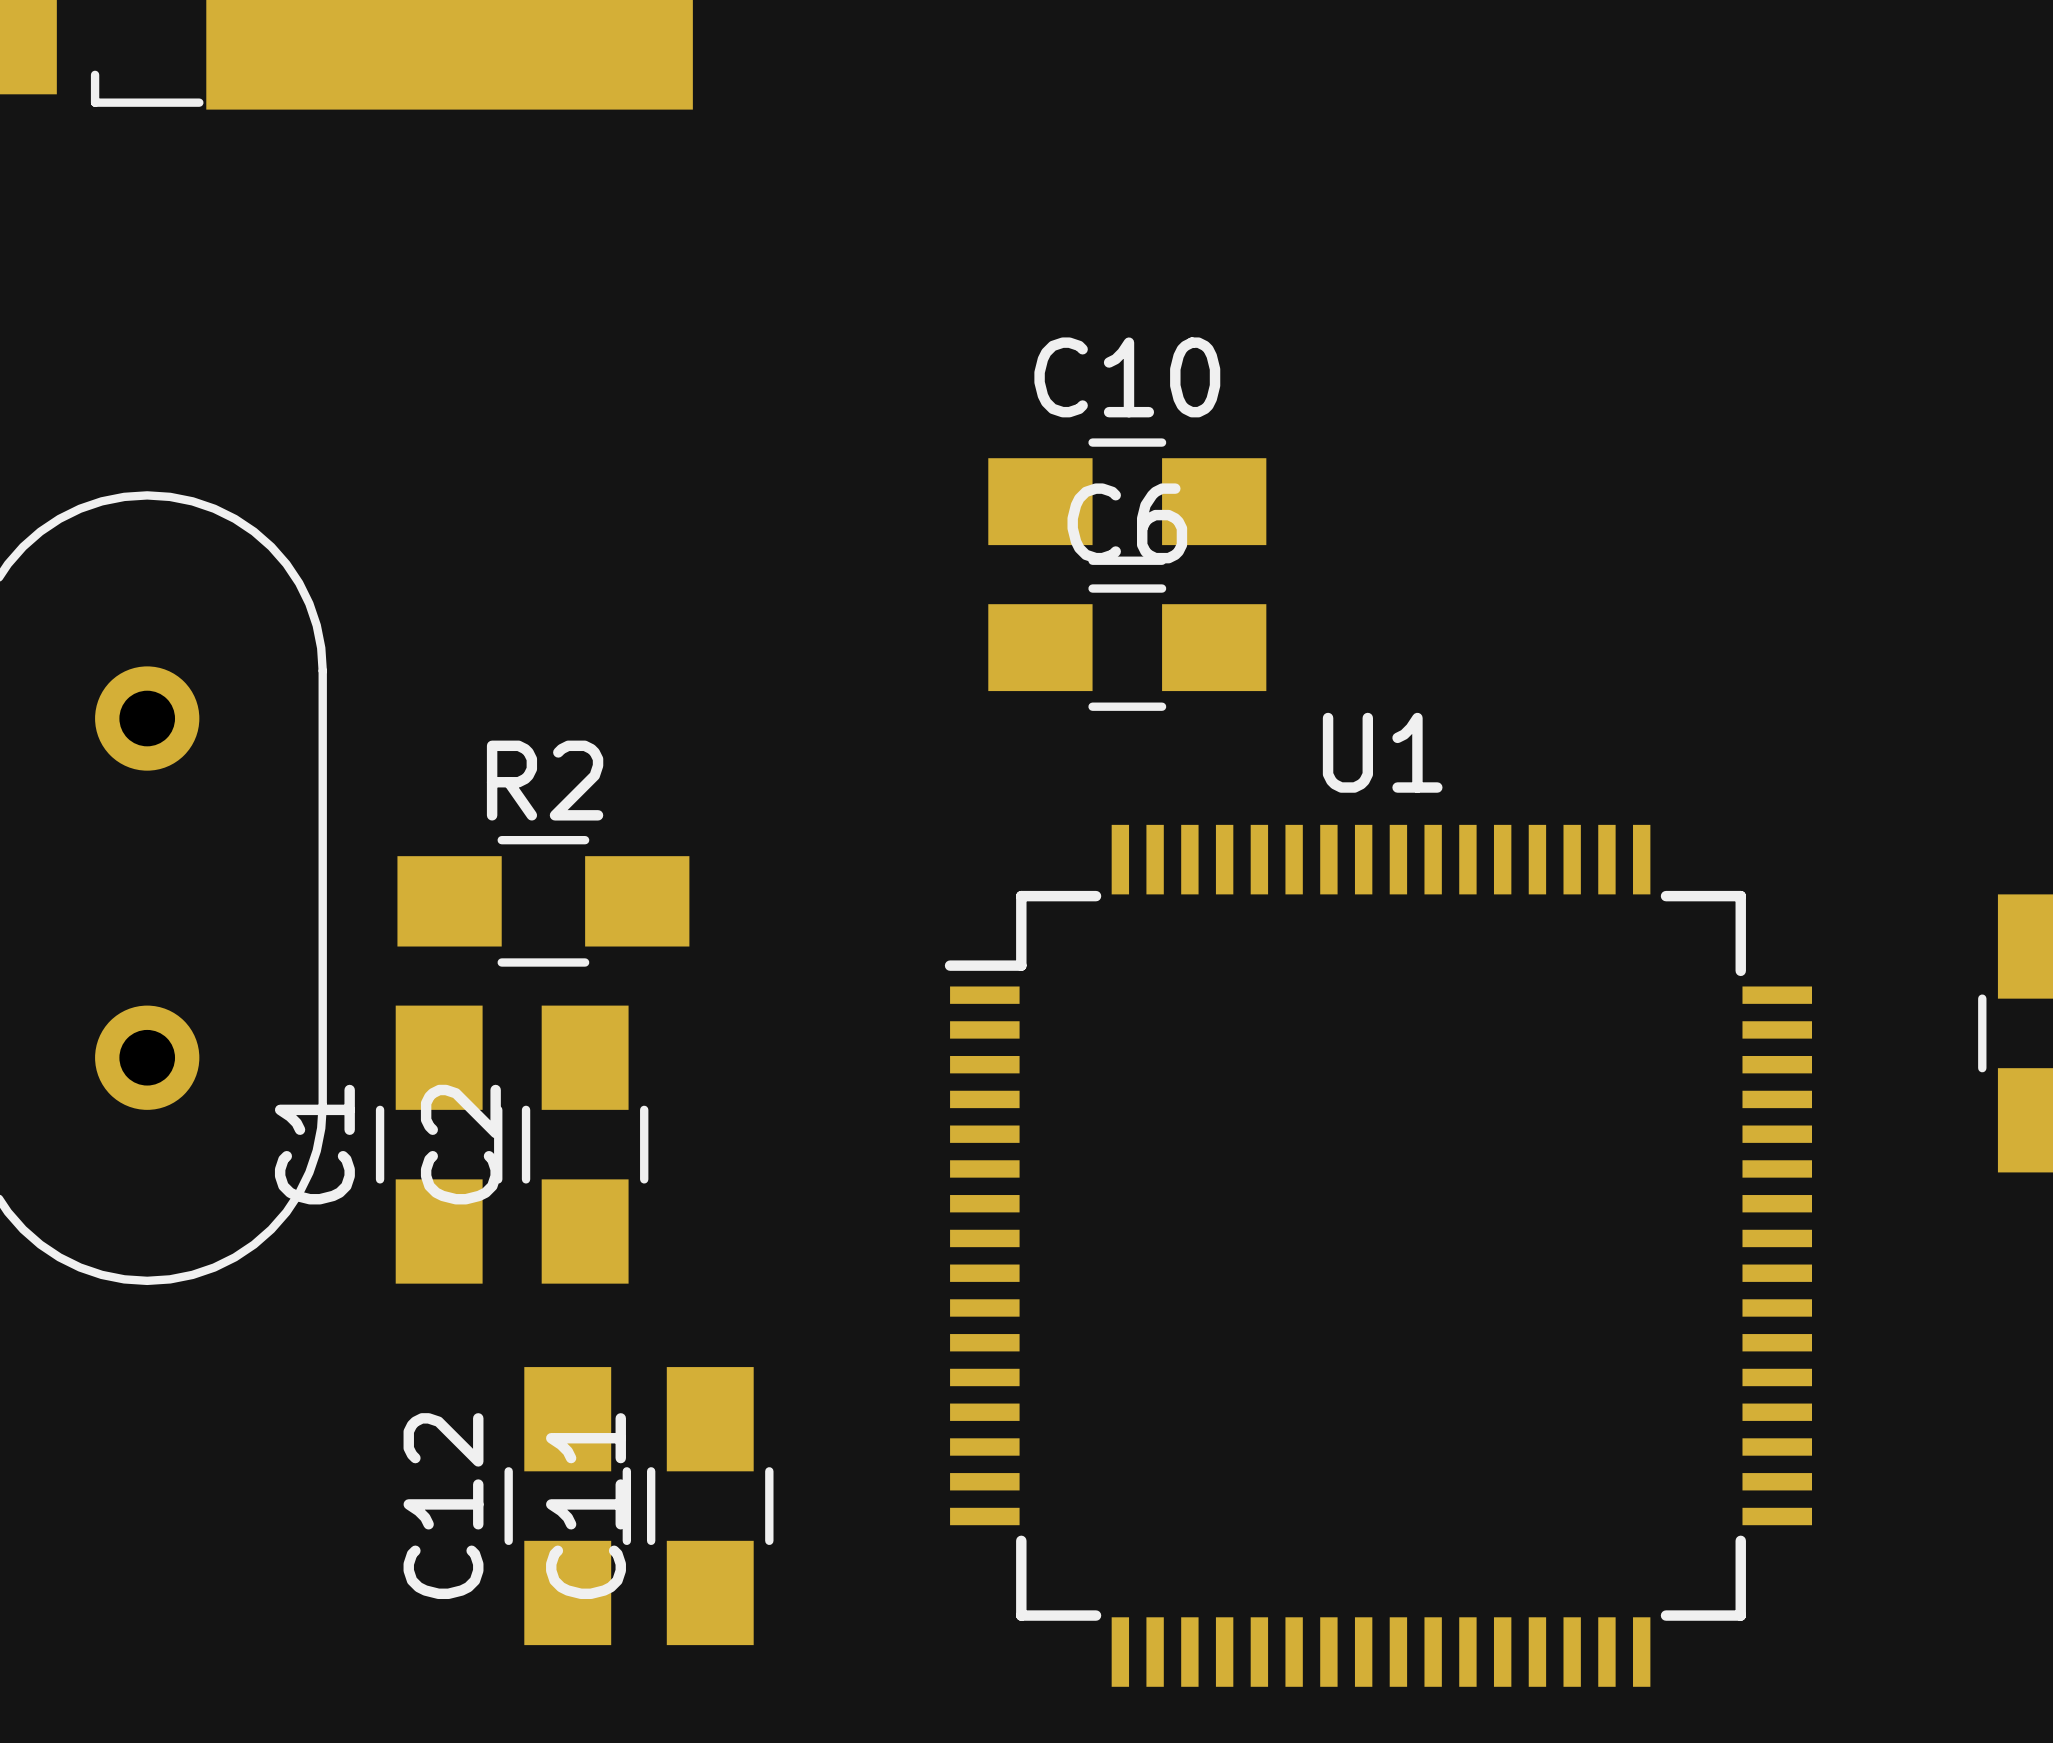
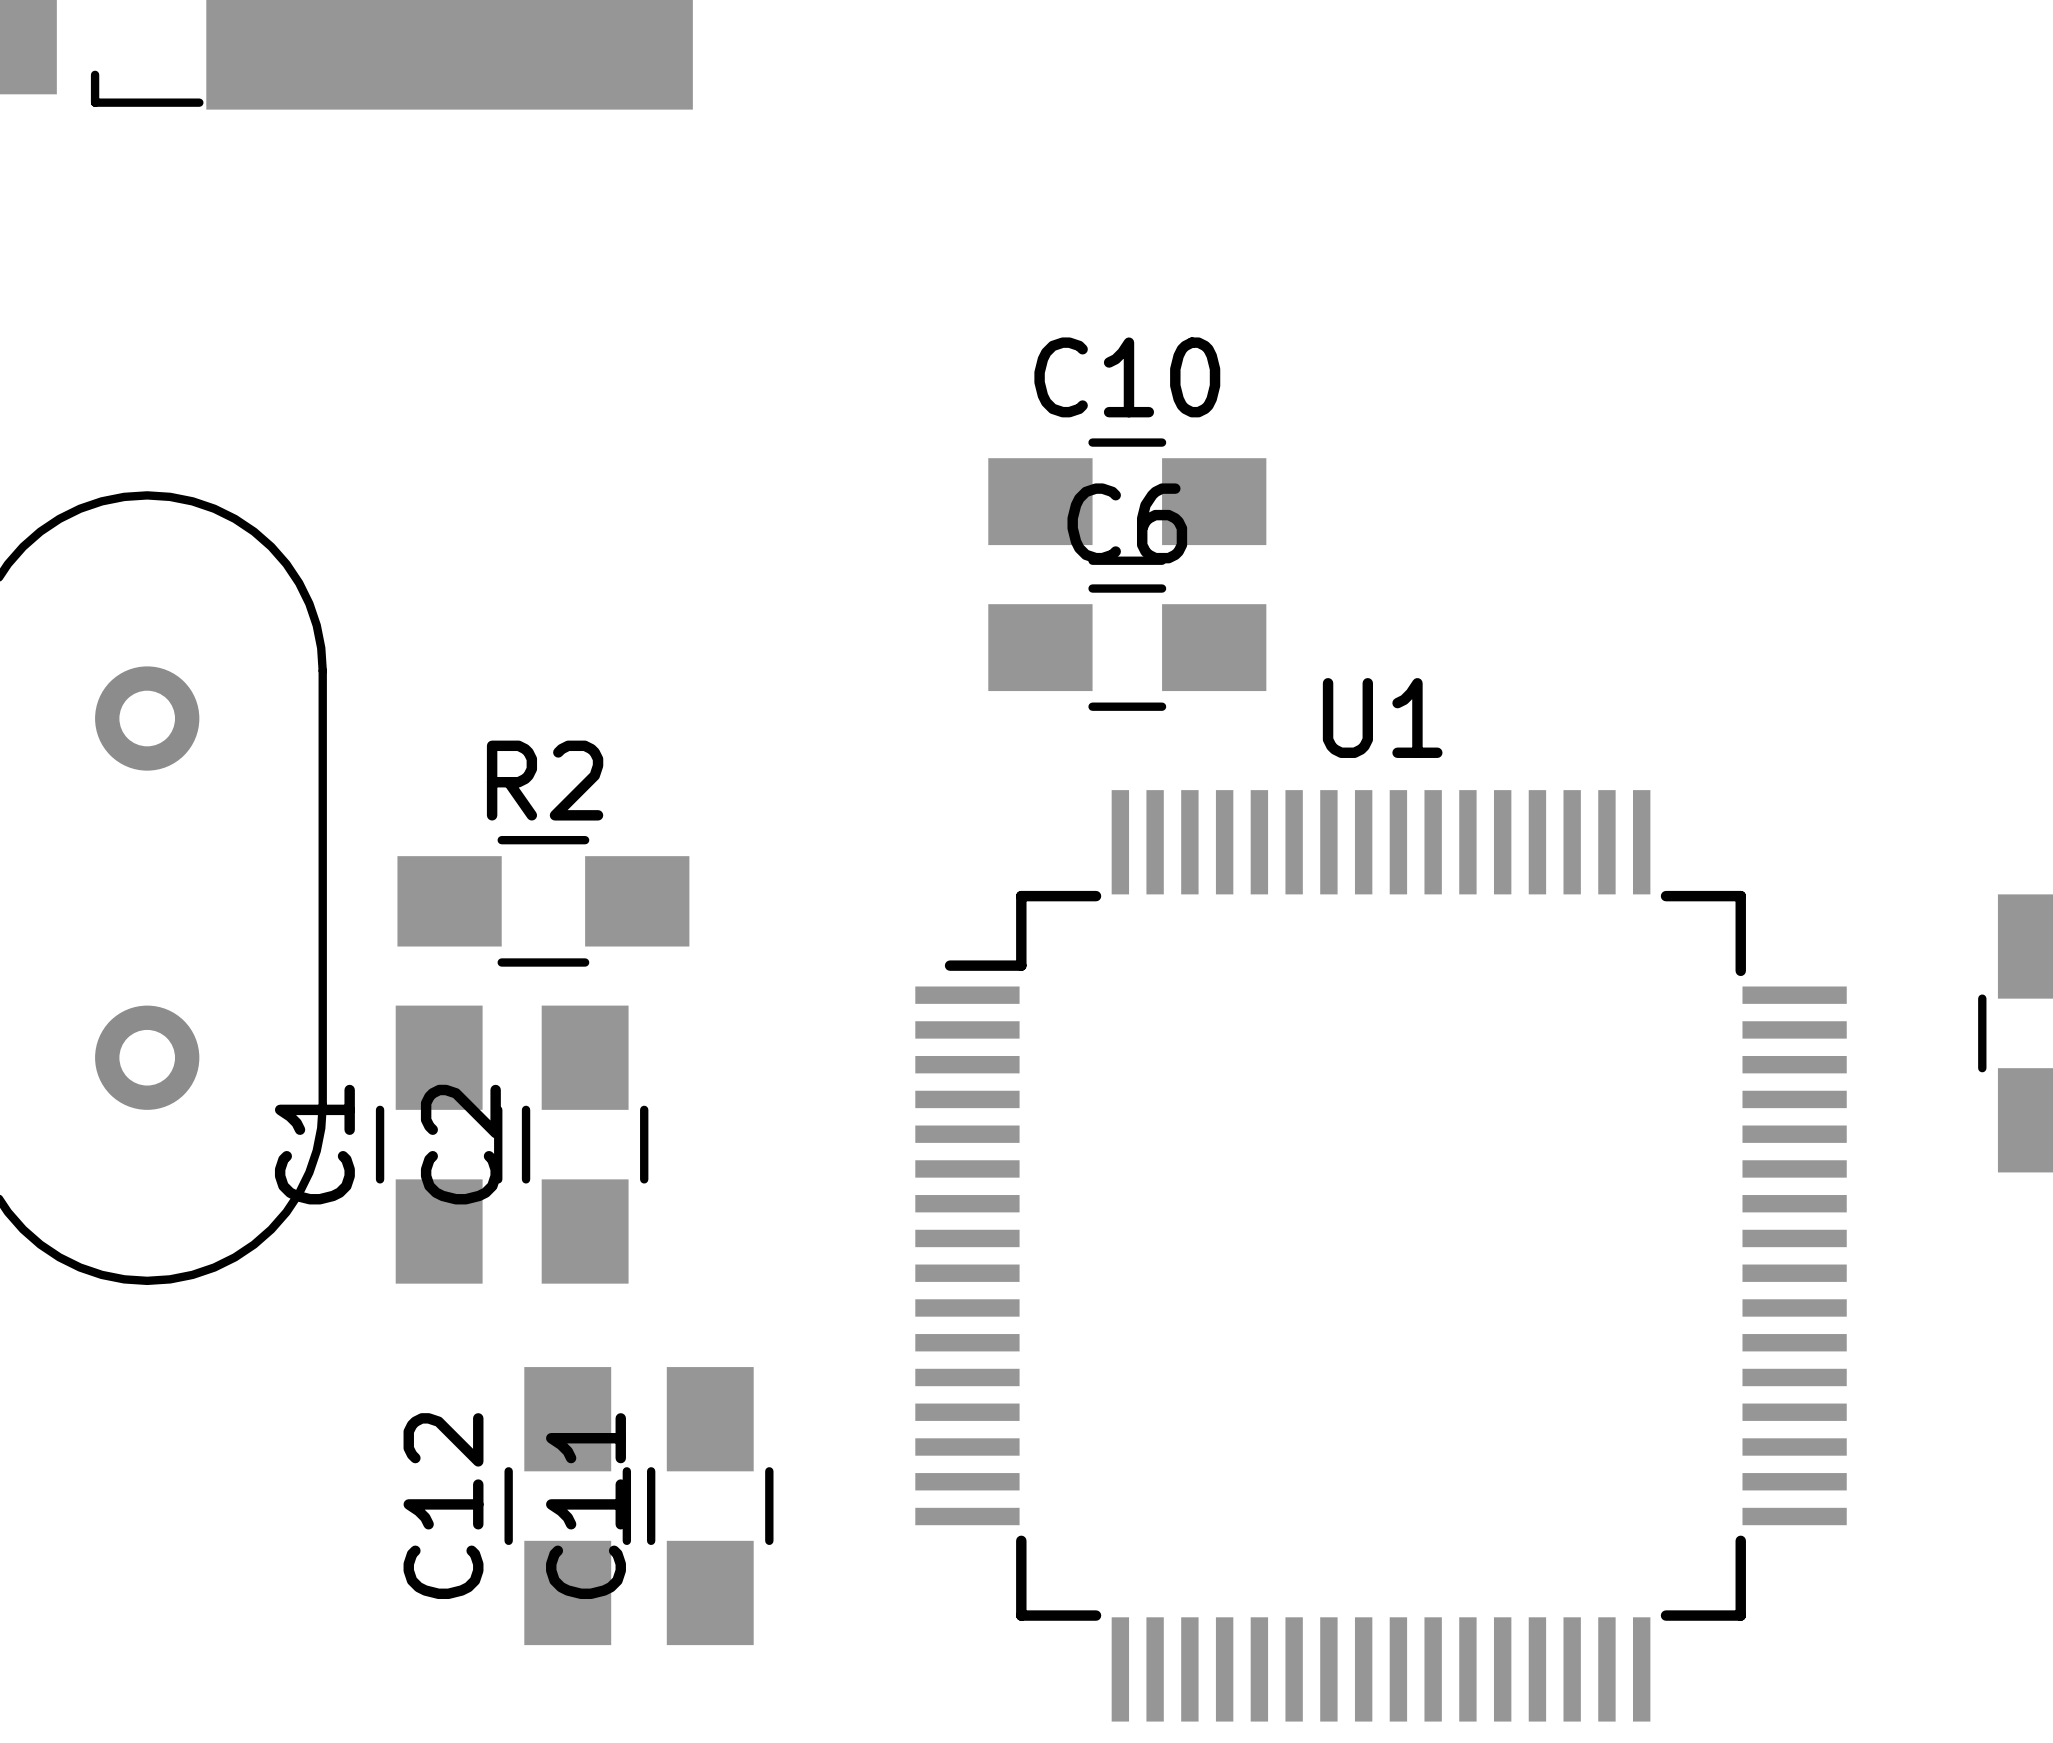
U1 name position: U1 (1382, 752) -> U1 (1382, 718)
U1 footprint: [944, 824, 1812, 1687] -> [915, 790, 1847, 1722]

